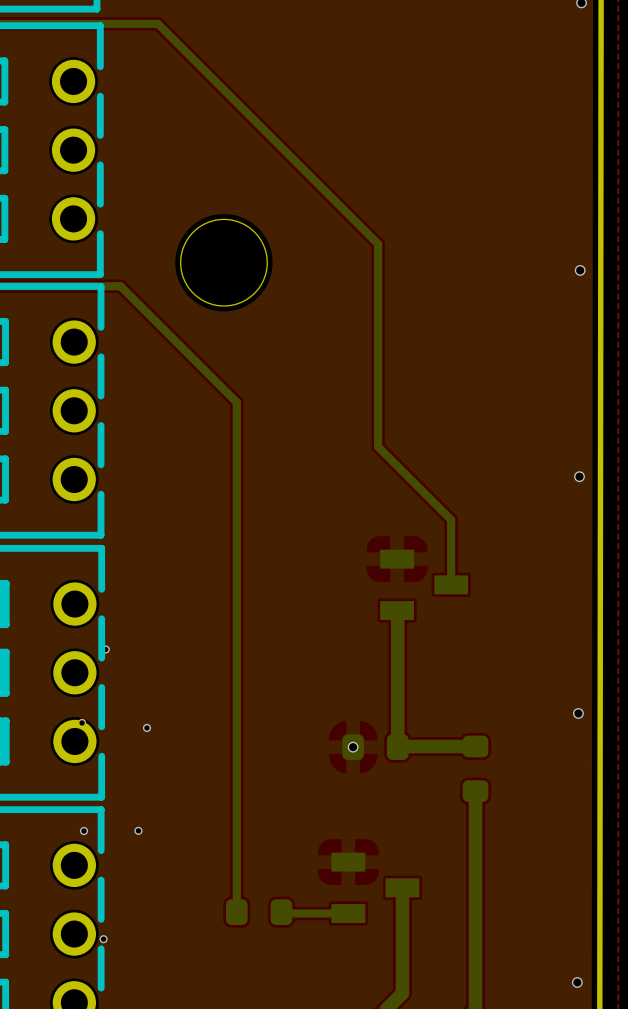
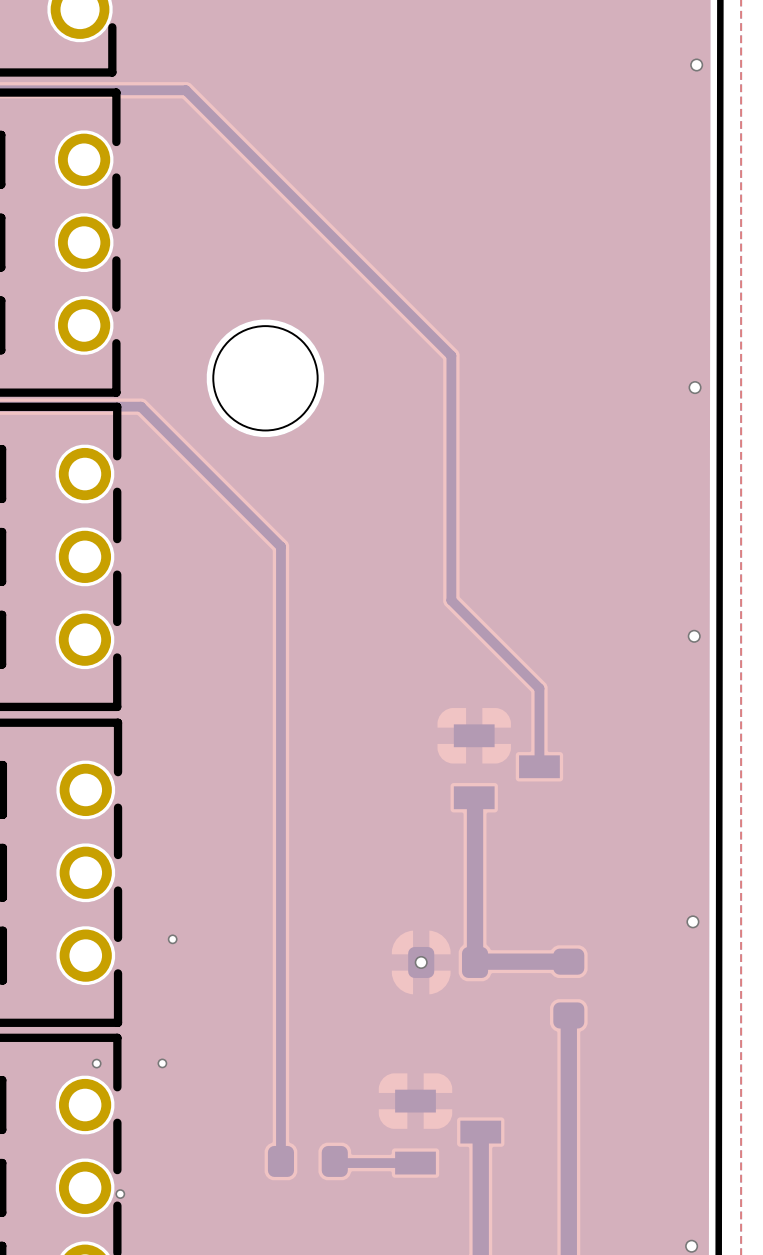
via: (105, 649) -> none
via: (82, 722) -> none

